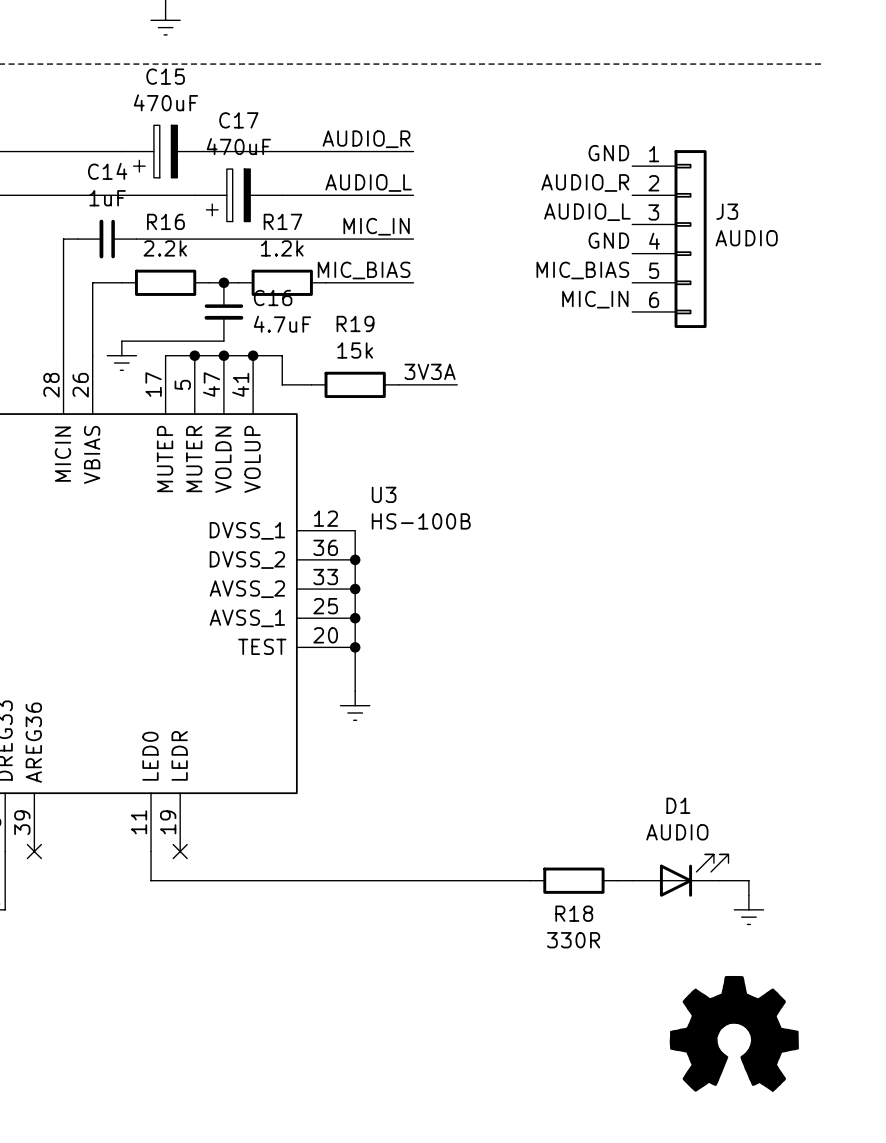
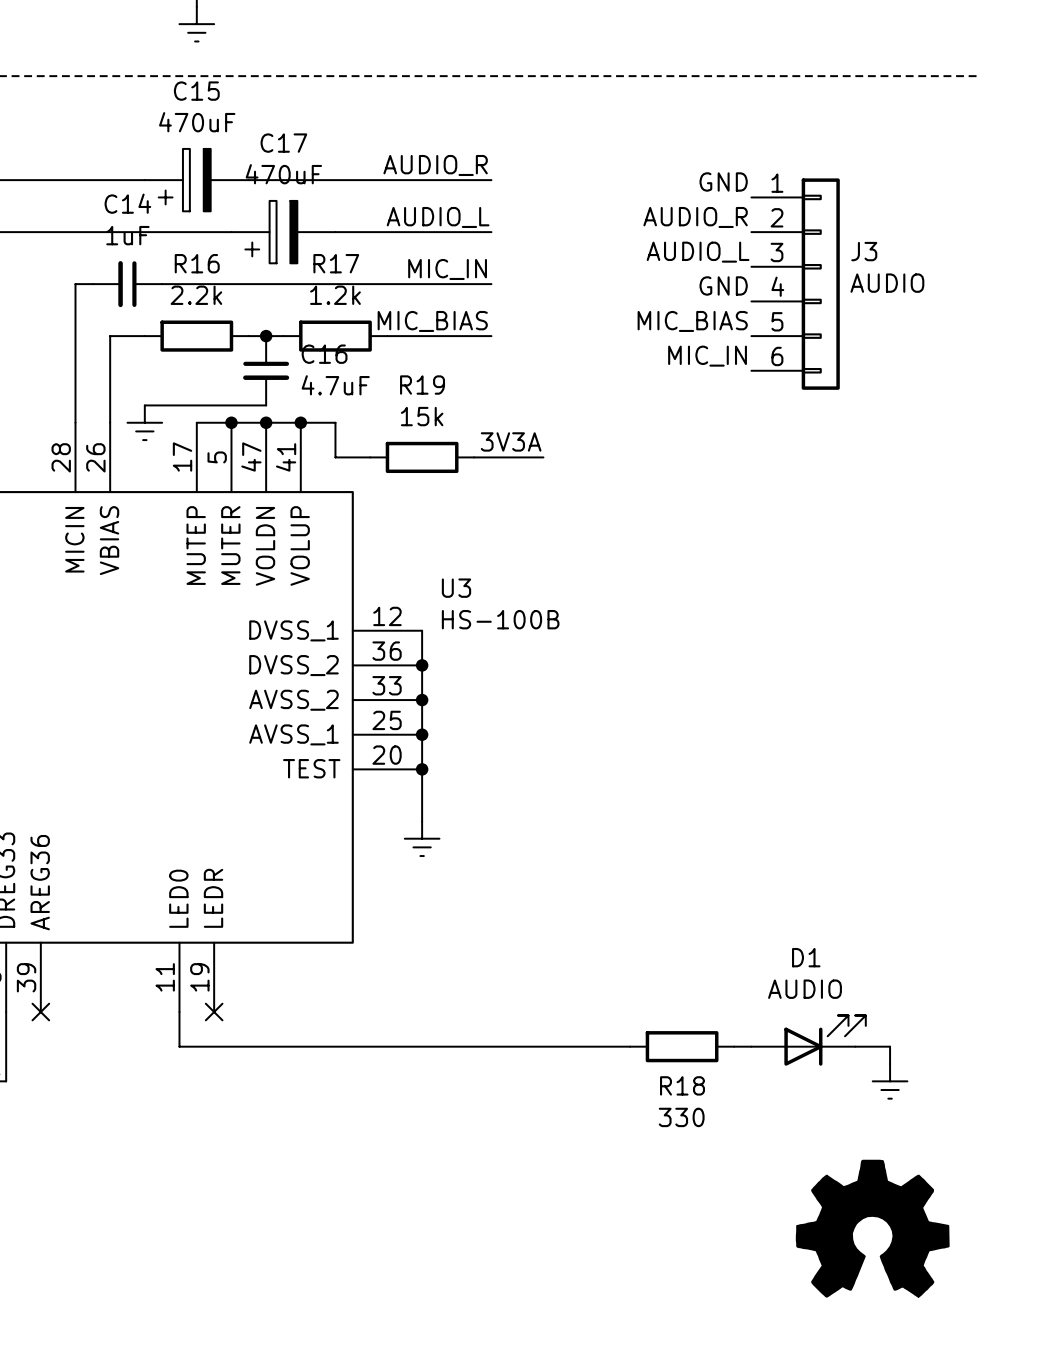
R18 value: 330R (573, 940) -> 330 (681, 1117)

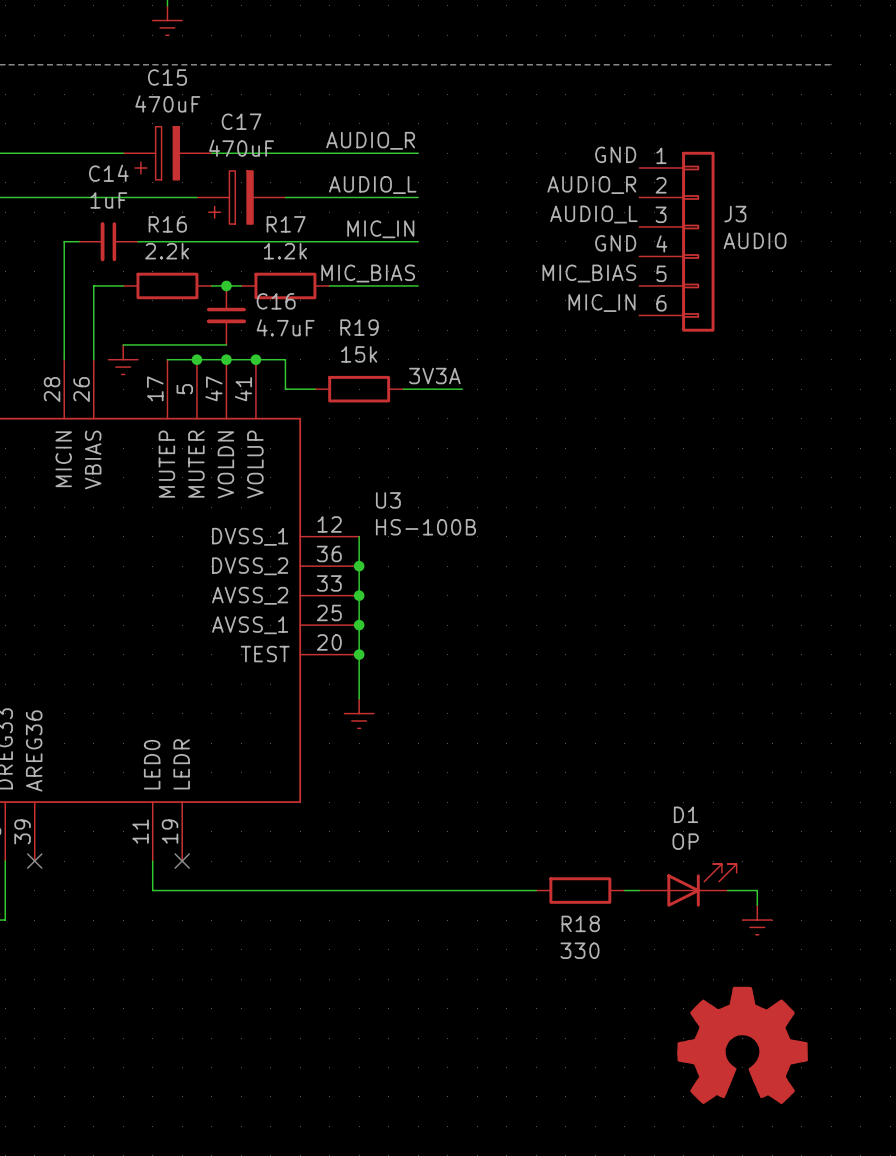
D1 value: AUDIO (805, 989) -> OP (685, 841)

